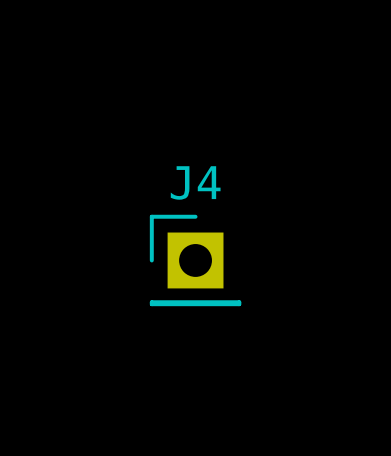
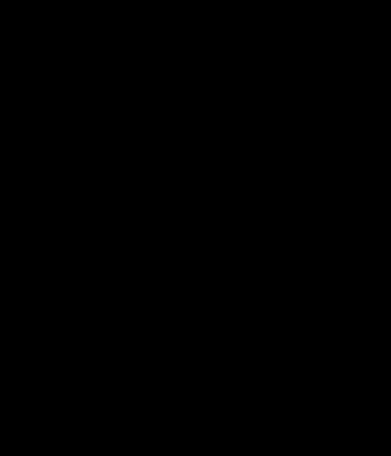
J4: (195, 260) -> none

